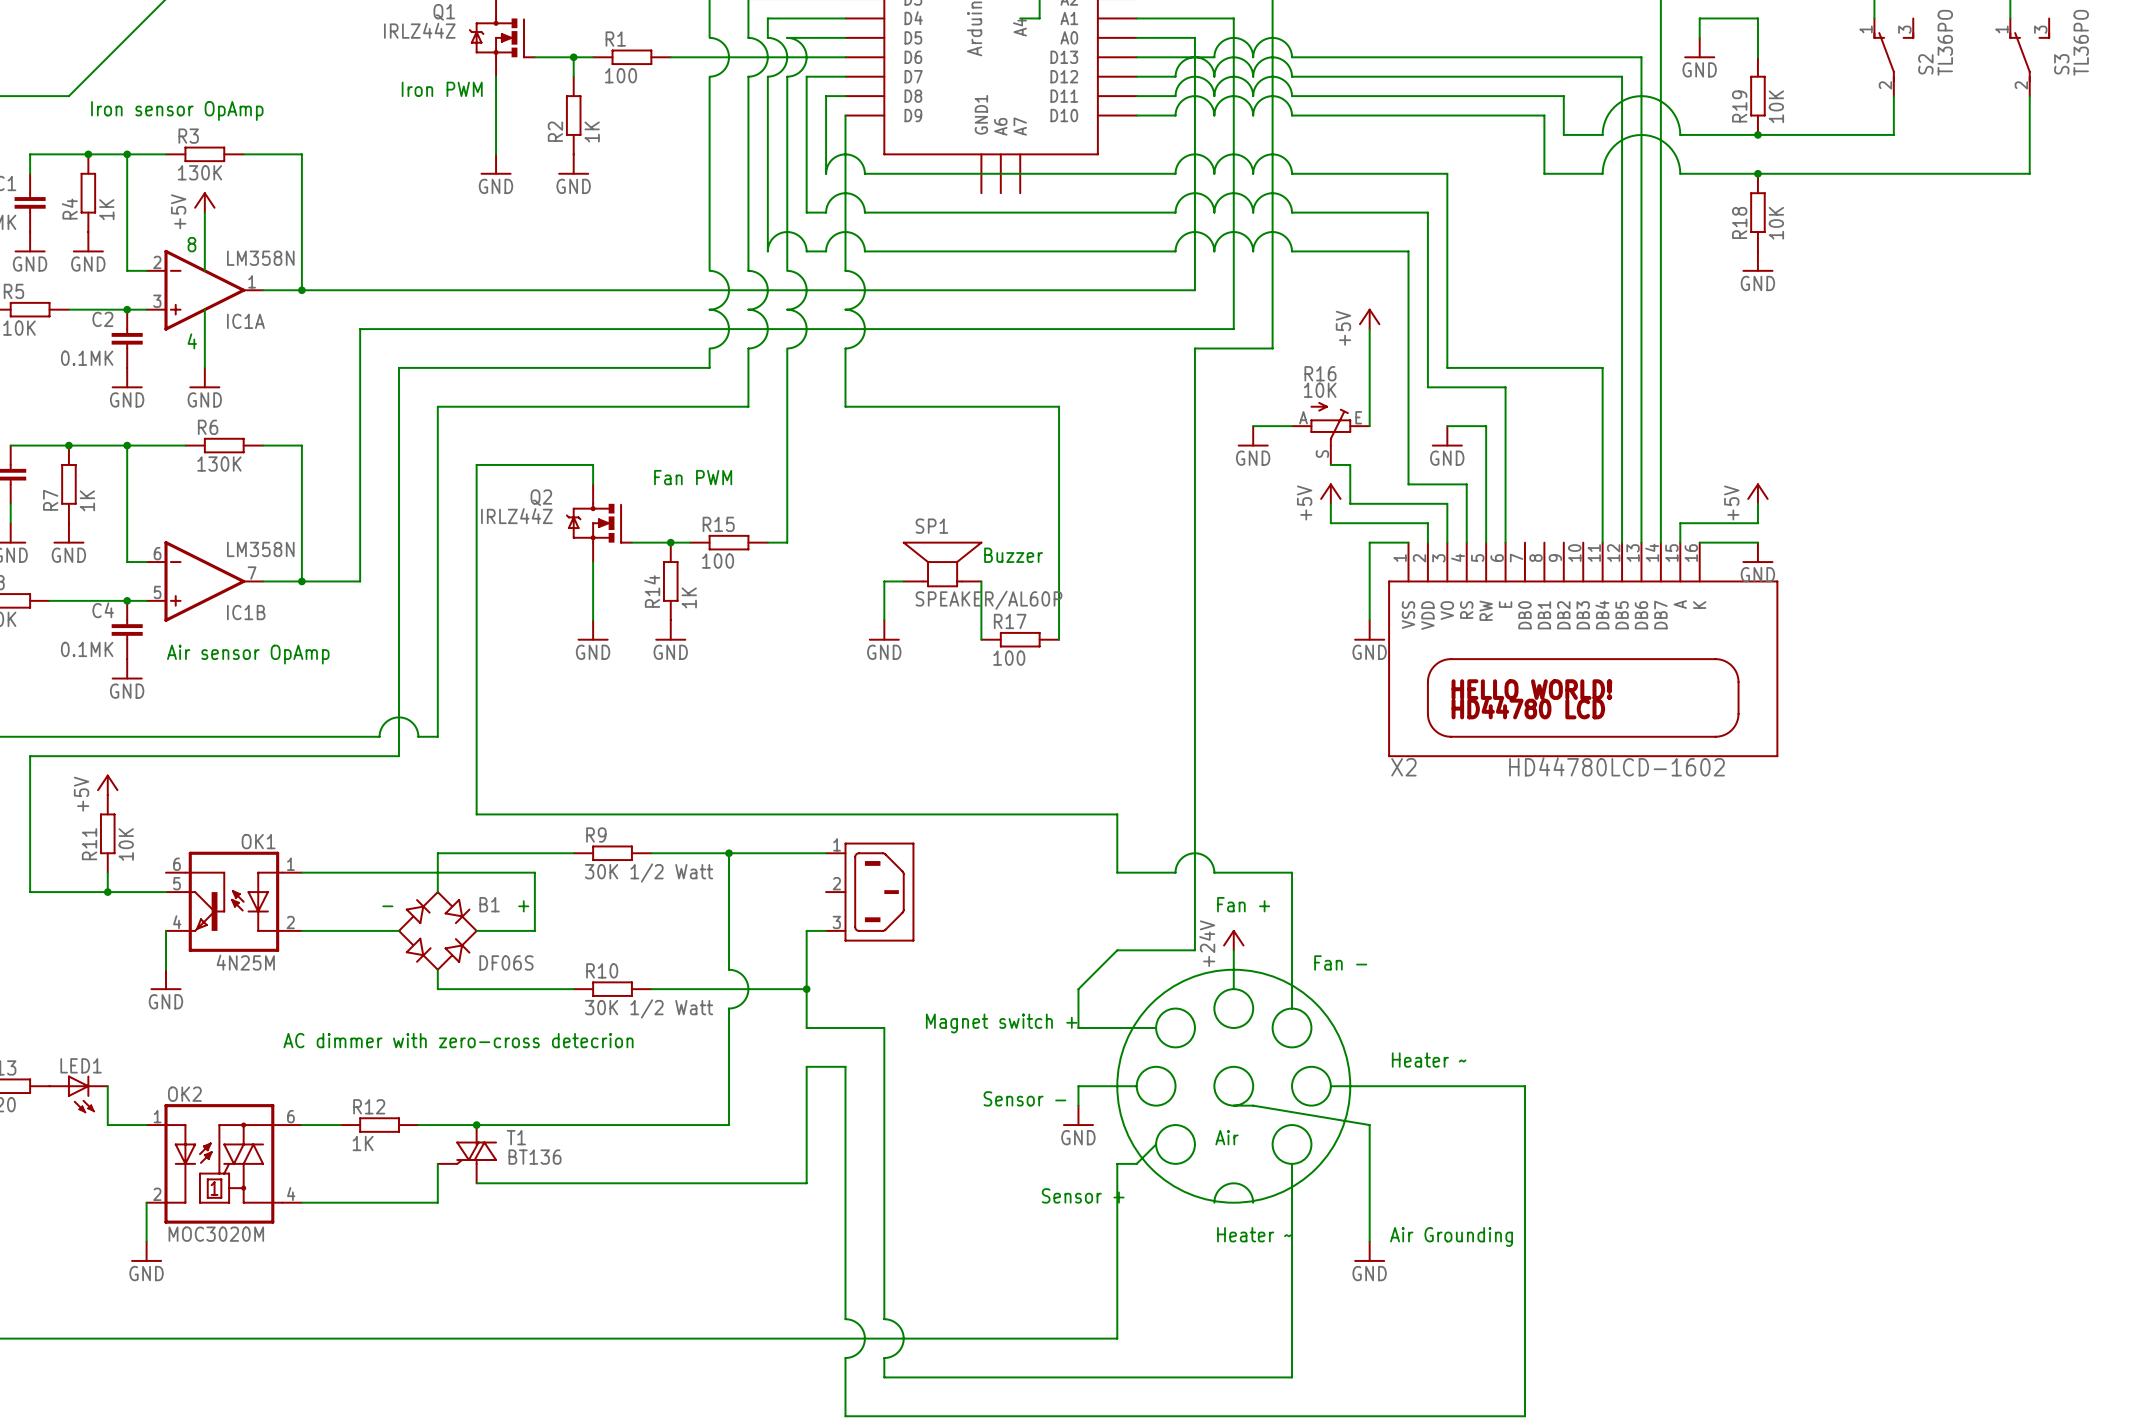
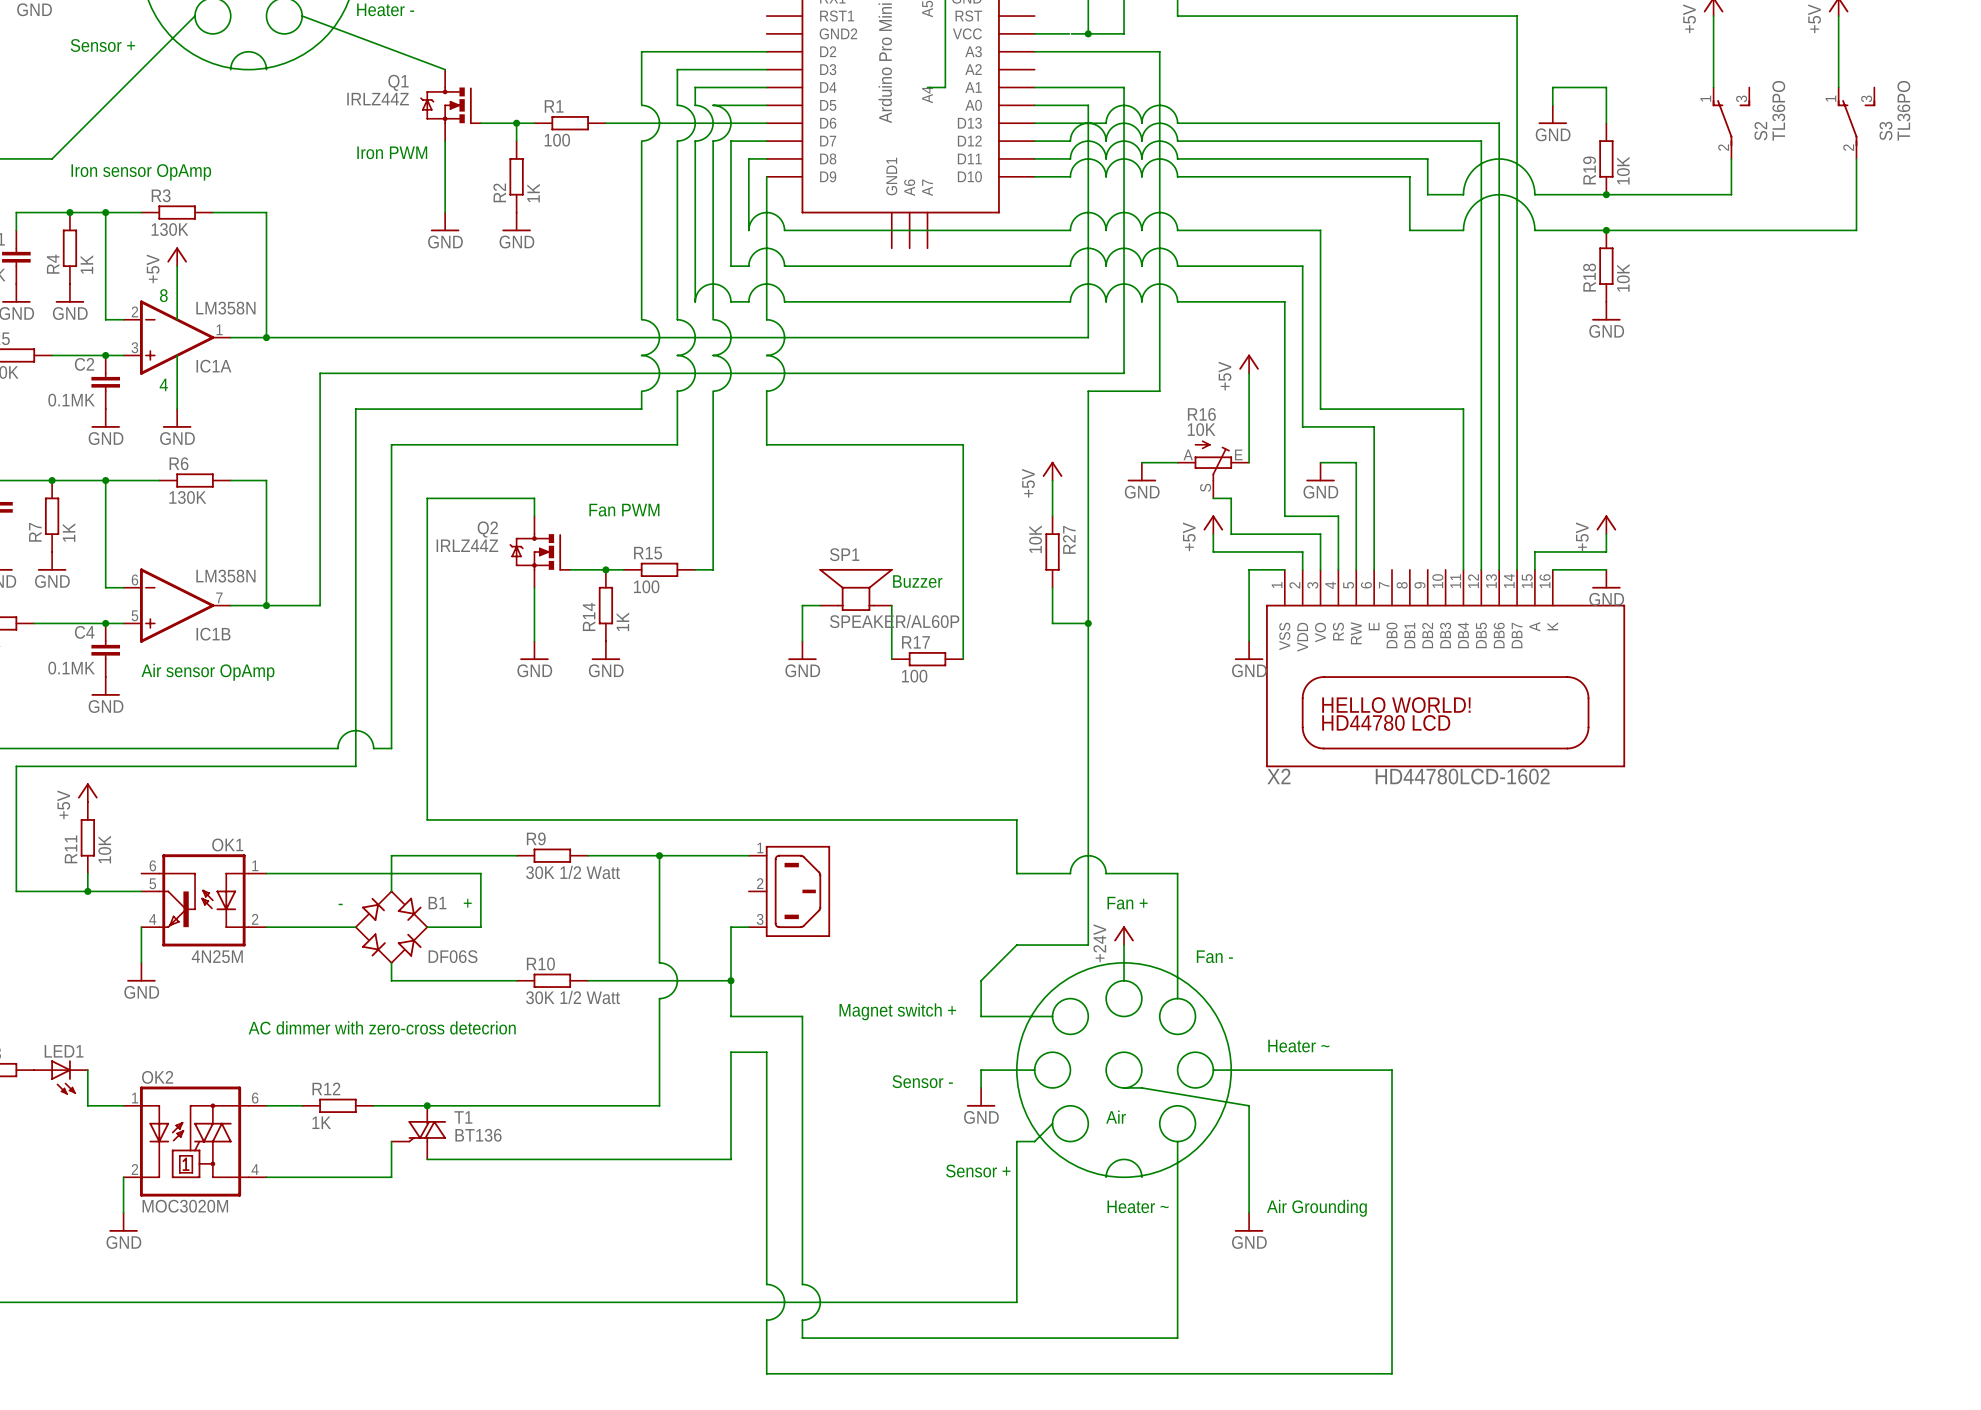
power symbol: none -> +5V (1052, 471)
wire: none -> (1052, 480) (1052, 516)
R27: none -> 10K (1052, 551)
wire: none -> (1052, 587) (1052, 623) (1088, 623)
junction: none -> (1088, 623)

